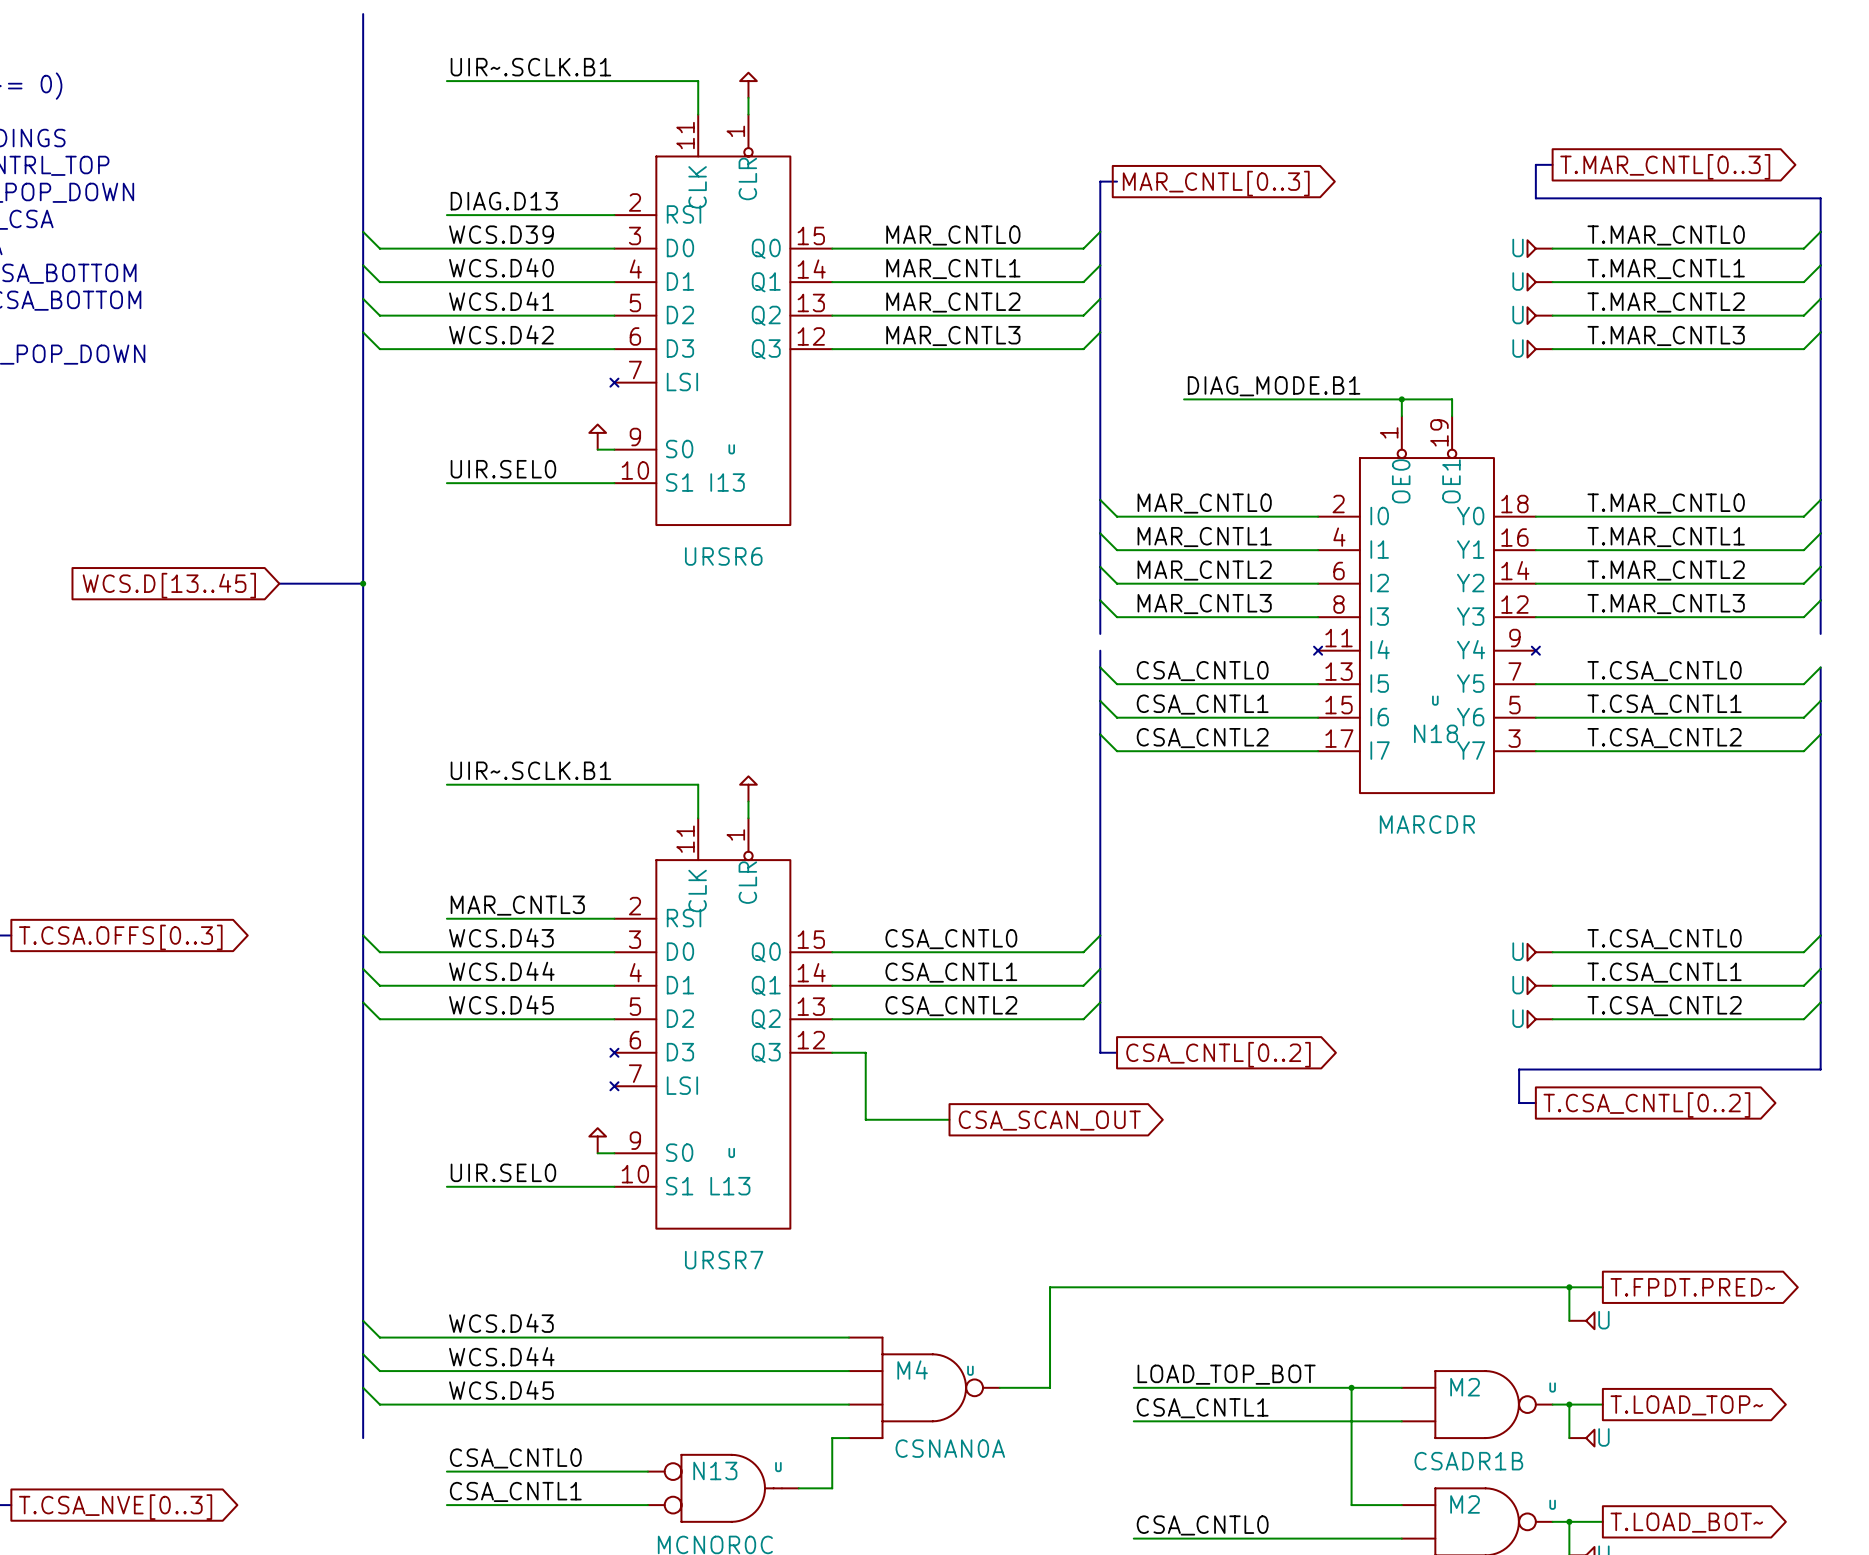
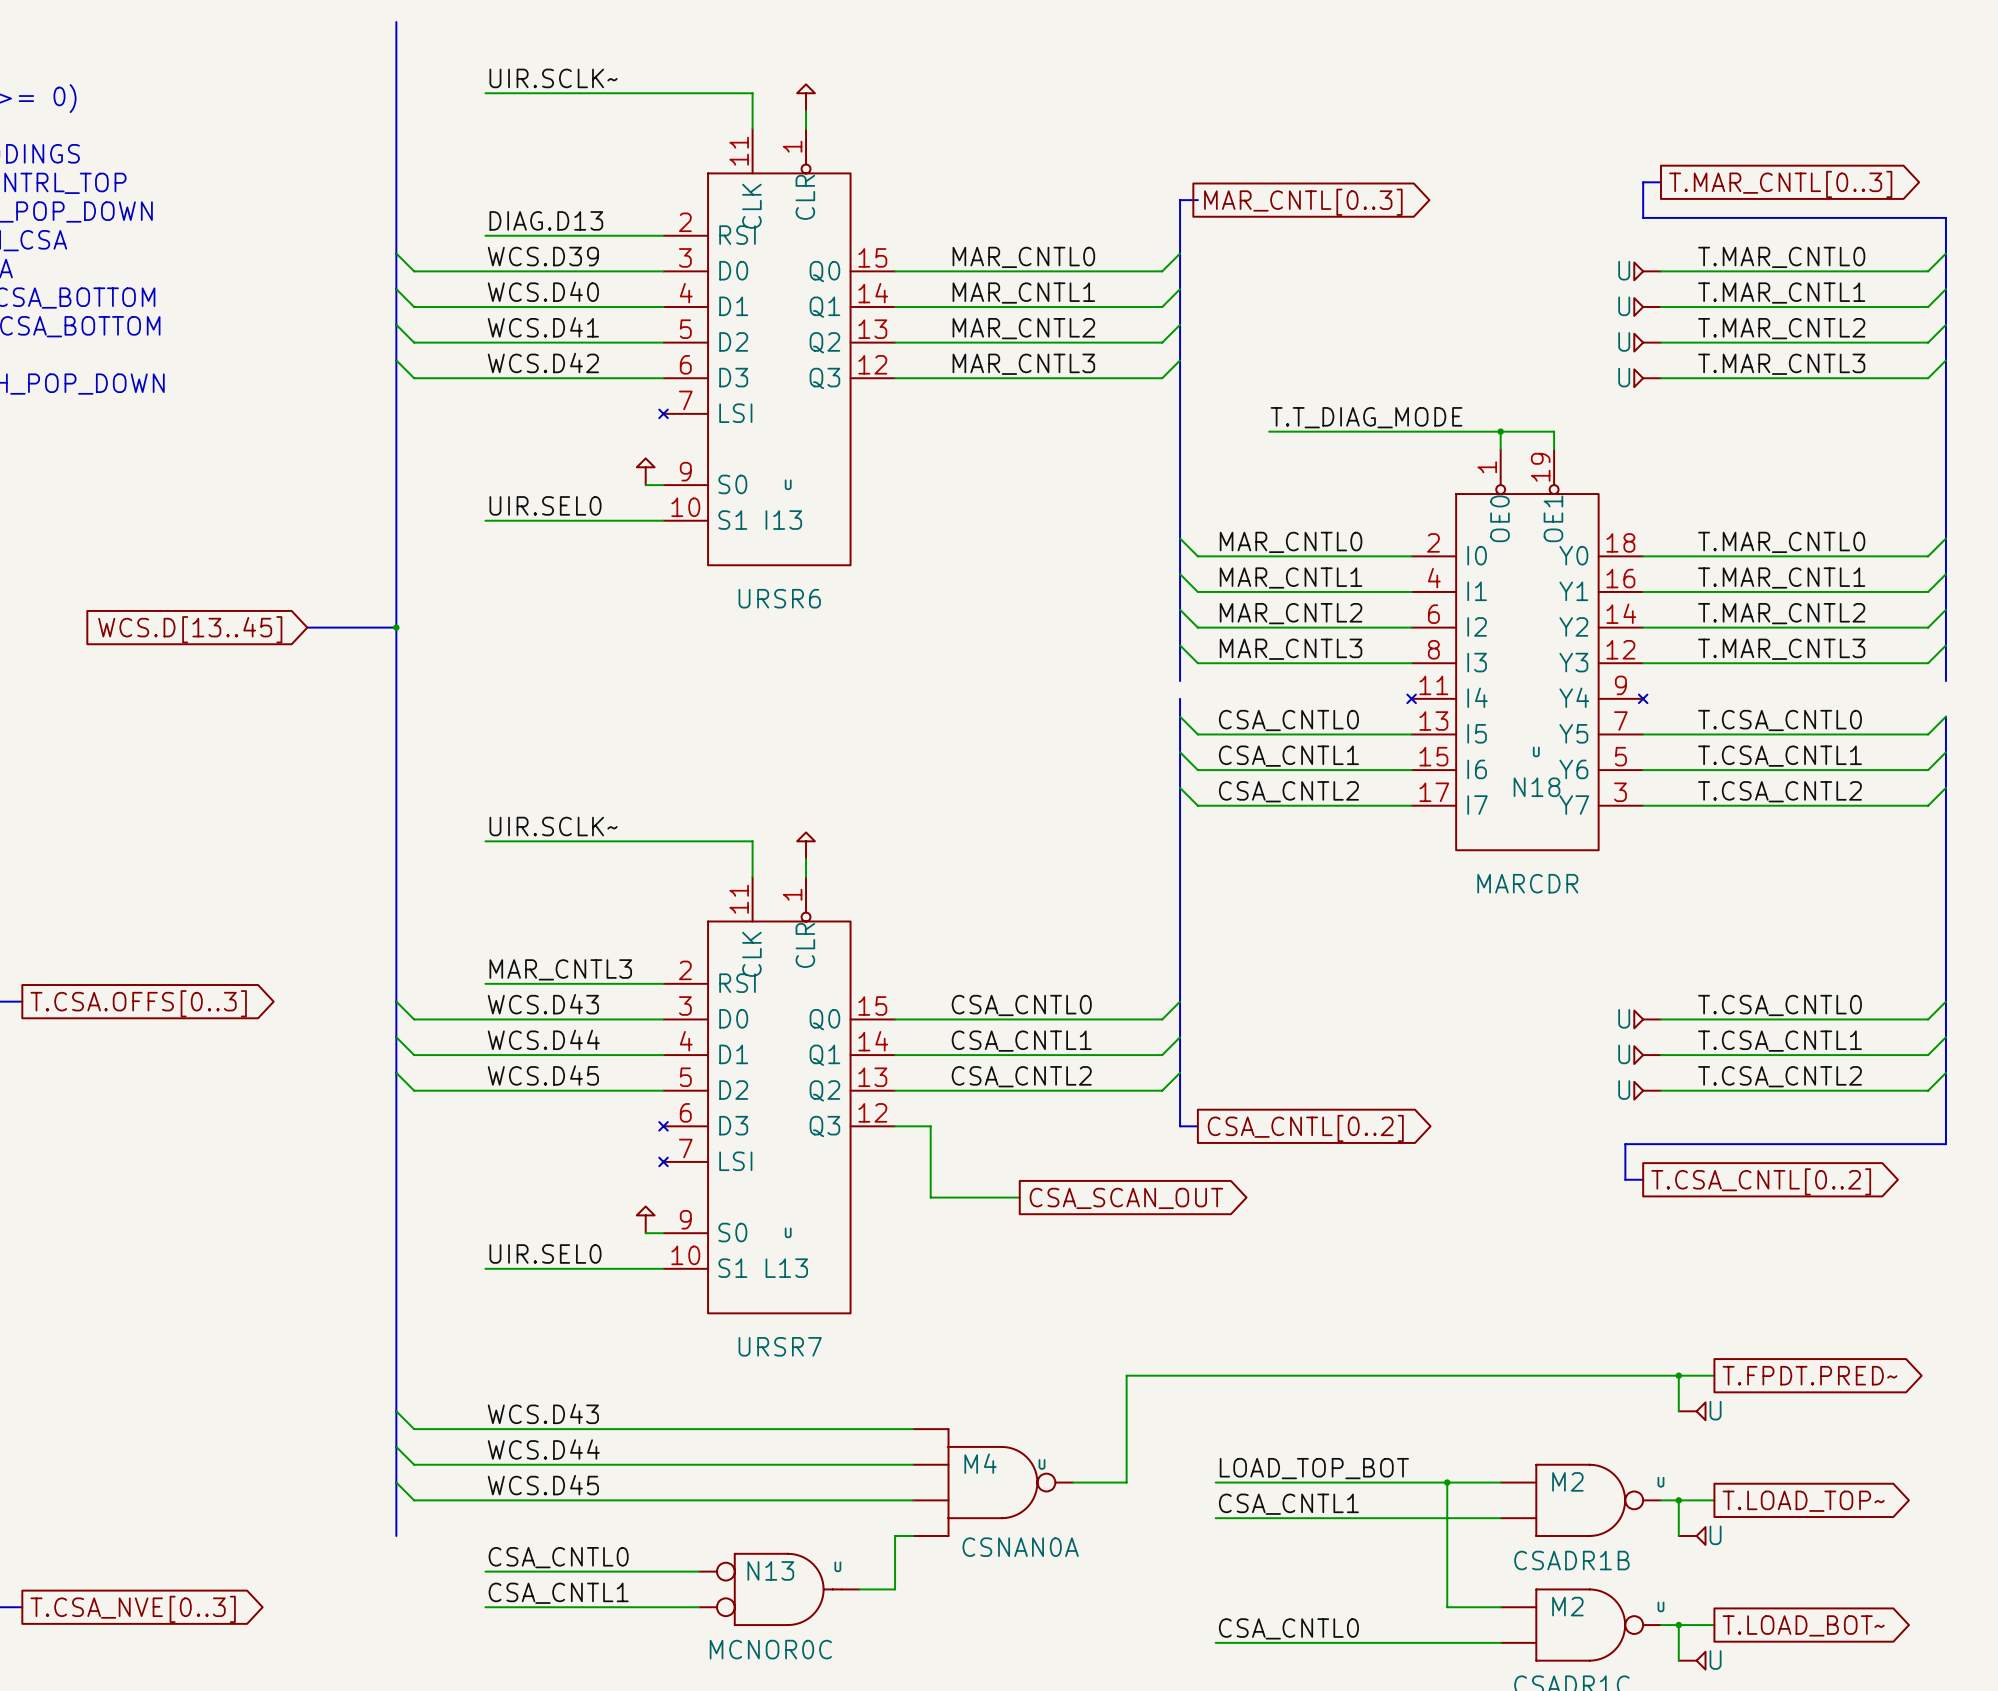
label: UIR~.SCLK.B1 (530, 67) -> UIR.SCLK~ (553, 78)
label: DIAG_MODE.B1 (1274, 386) -> T.T_DIAG_MODE (1366, 417)
label: UIR~.SCLK.B1 (530, 770) -> UIR.SCLK~ (553, 826)

